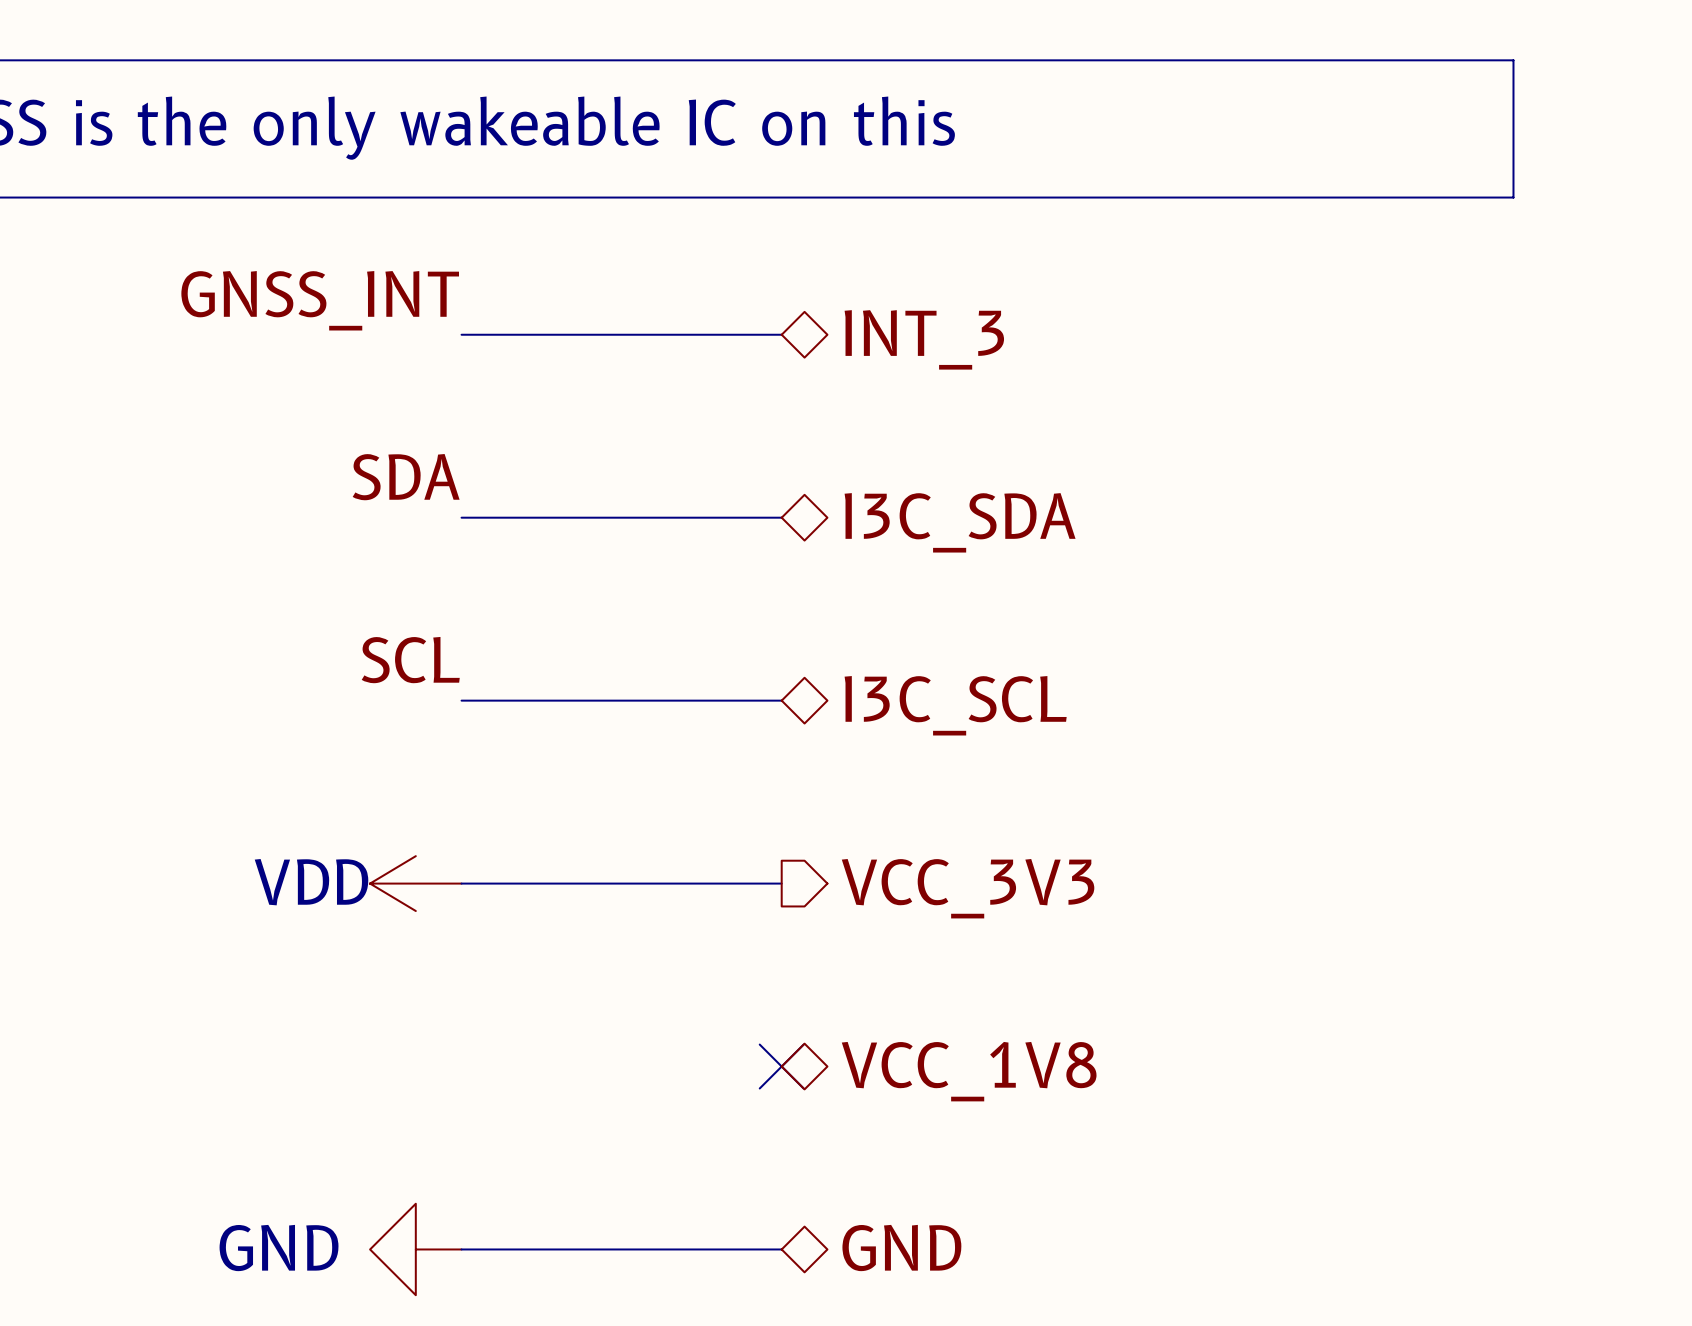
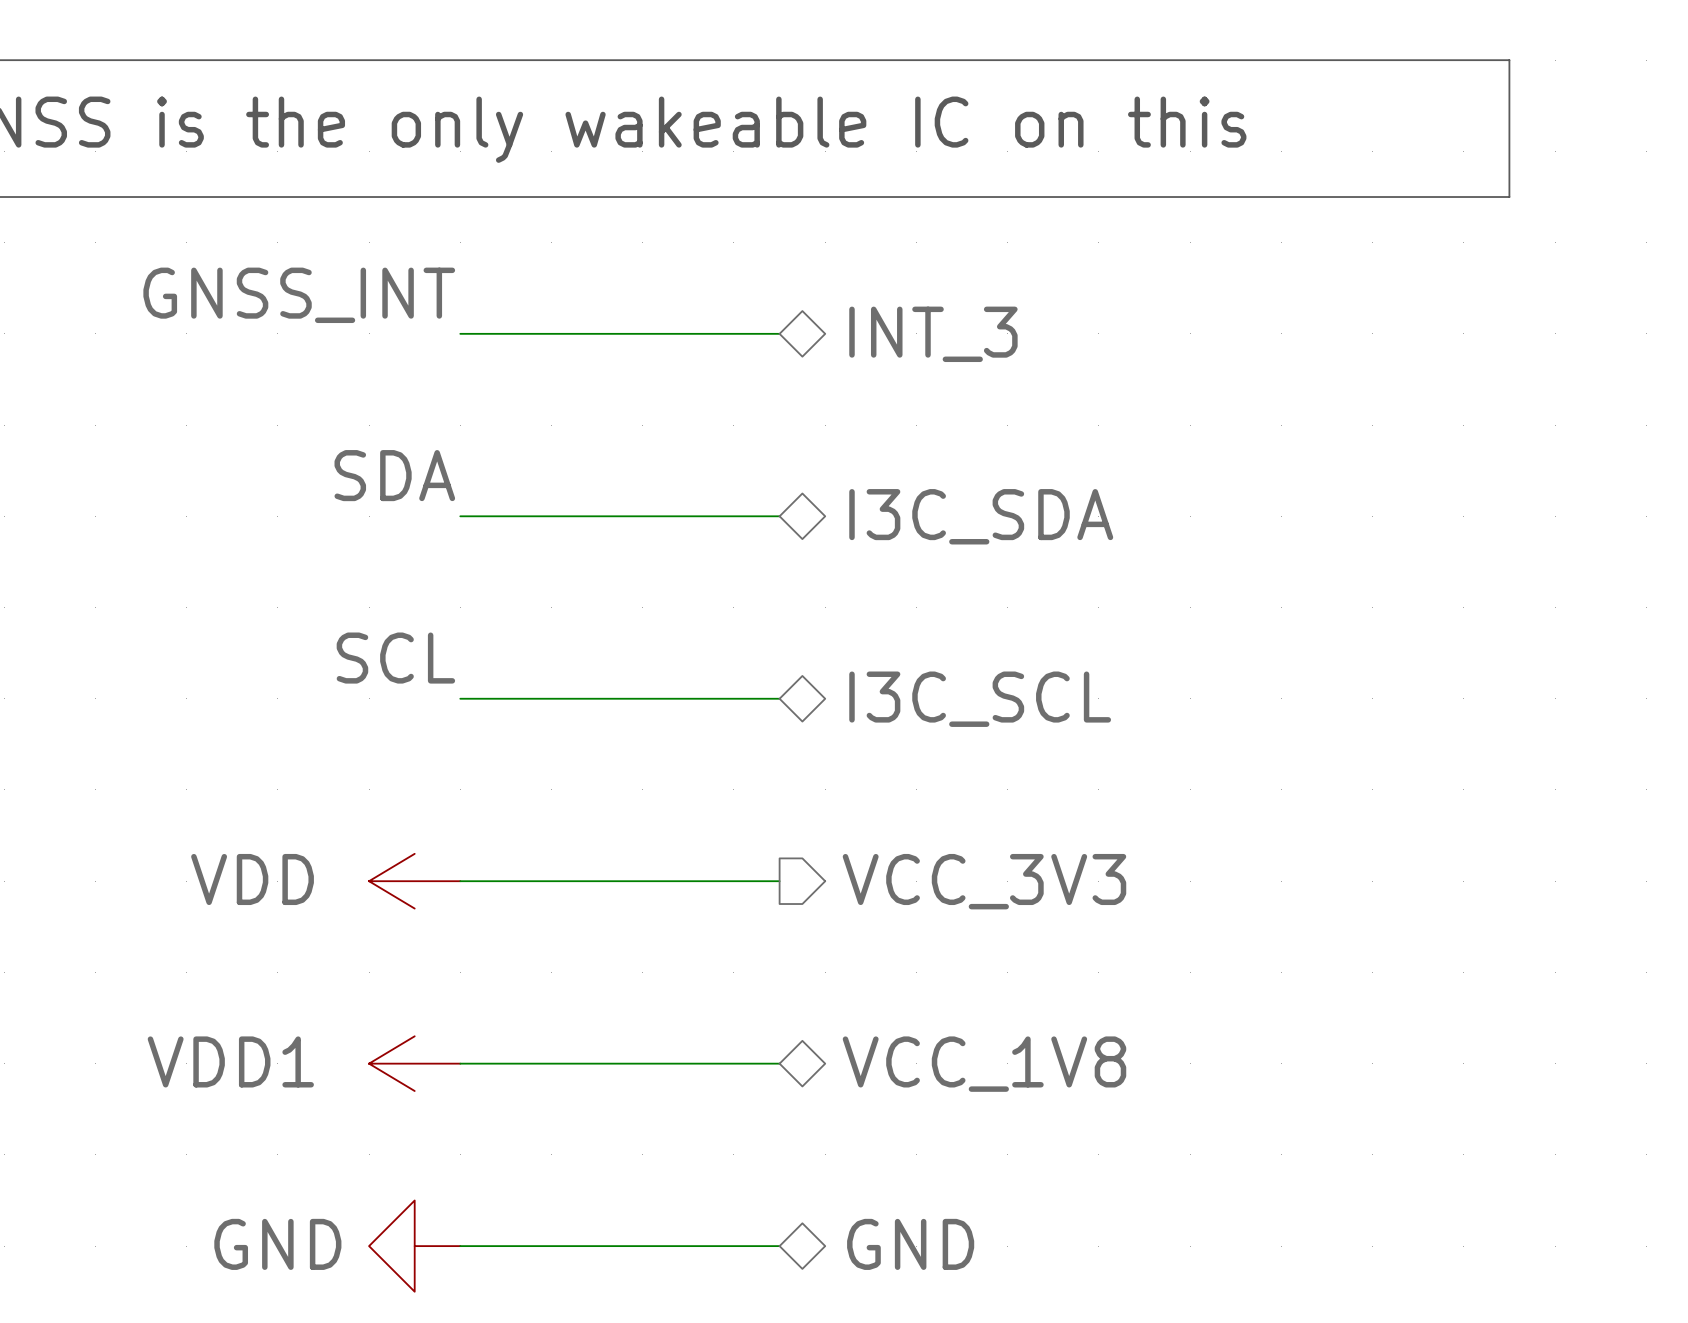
power symbol text position: VDD (311, 882) -> VDD (252, 879)
power symbol: none -> VDD1 (414, 1063)
wire: none -> (460, 1063) (779, 1063)
no-connect mark: (781, 1066) -> none

